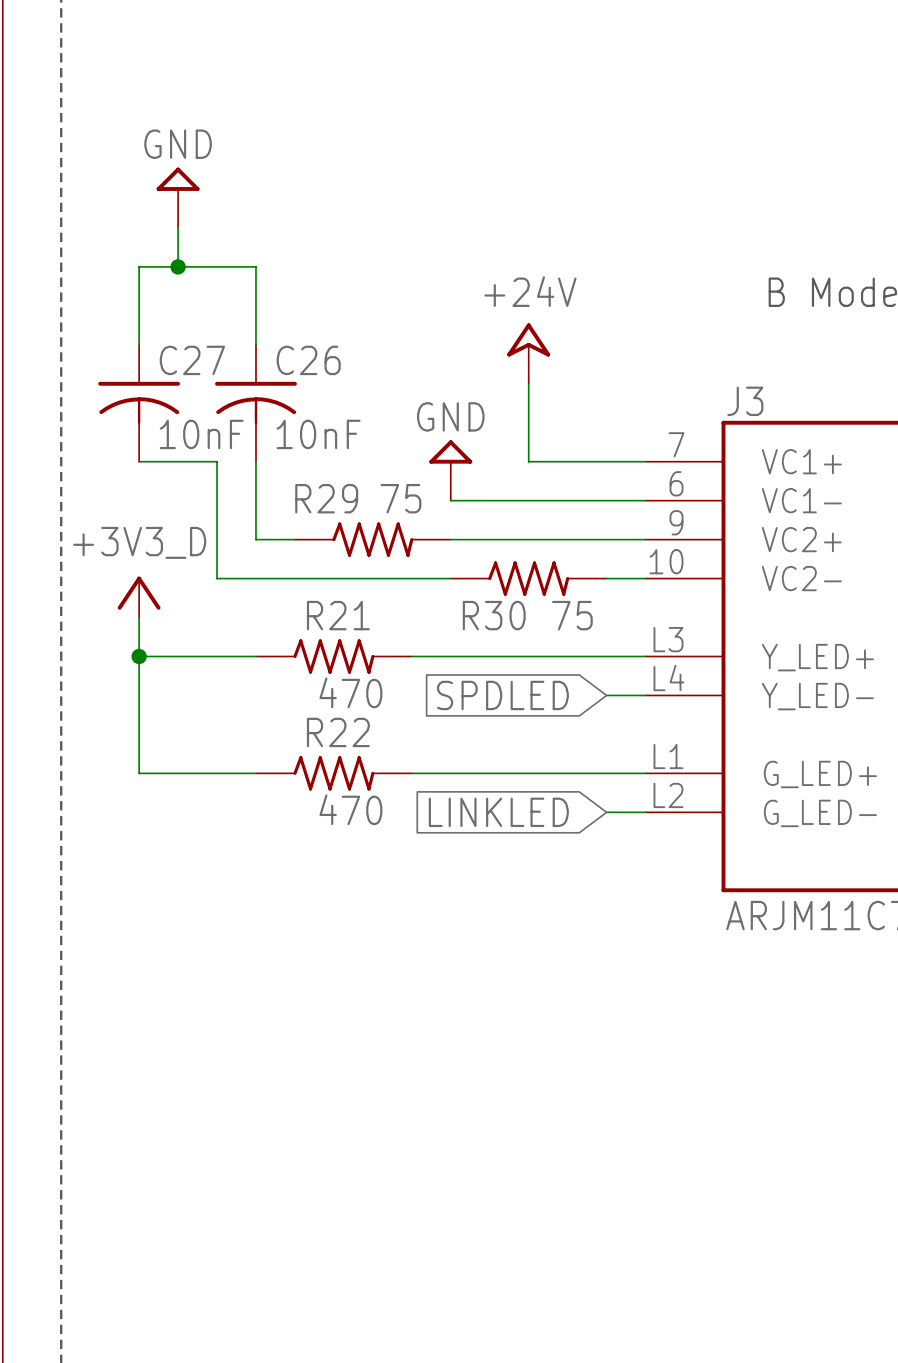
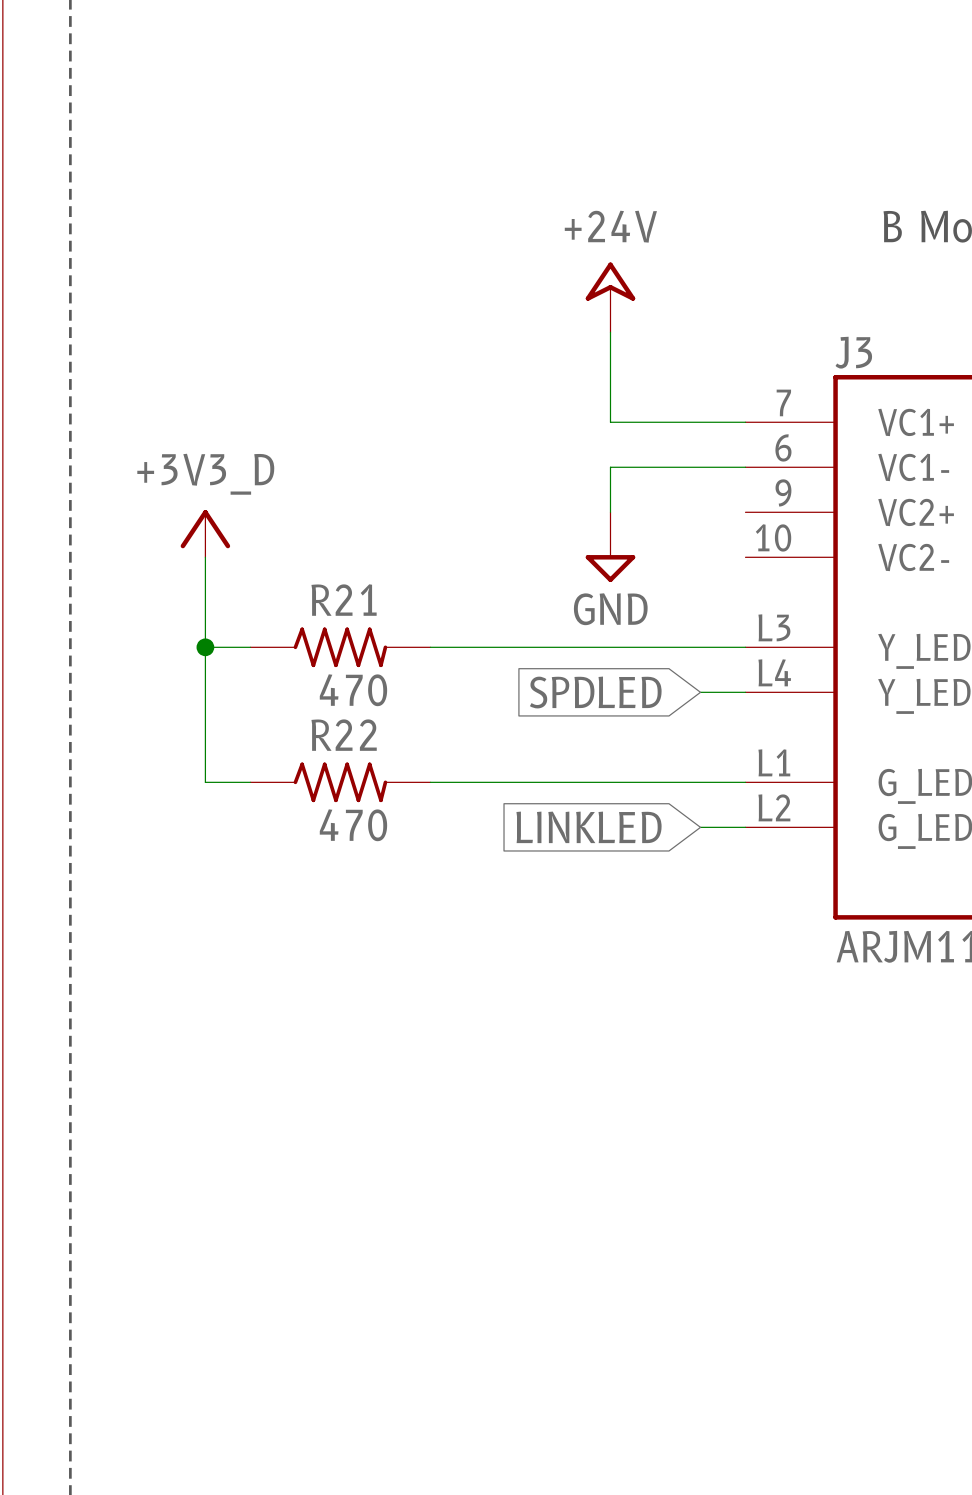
power symbol: GND (178, 197) -> none
wire: (178, 227) (178, 266) -> none
junction: (178, 266) -> none
wire: (139, 344) (139, 266) (255, 266) (255, 344) -> none
C27: 10nF (139, 403) -> none
C26: 10nF (255, 403) -> none
power symbol rotation: 0° (450, 451) -> 180° (610, 568)
wire: (139, 461) (217, 461) (217, 578) (450, 578) -> none
wire: (255, 461) (255, 539) (294, 539) -> none
power symbol position: GND (450, 470) -> GND (610, 547)
wire: (450, 500) (528, 500) -> (610, 512) (610, 467)
R29: 75 (372, 539) -> none
wire: (450, 539) (645, 539) -> none
R30: 75 (528, 578) -> none
wire: (606, 578) (645, 578) -> none
power symbol position: +3V3_D (139, 597) -> +3V3_D (205, 533)
wire: (139, 617) (139, 773) (178, 773) -> (205, 557) (205, 782)
wire: (139, 656) (178, 656) -> none
junction position: (139, 656) -> (205, 647)
R21 position: (333, 656) -> (340, 647)
R22 position: (333, 773) -> (340, 782)

